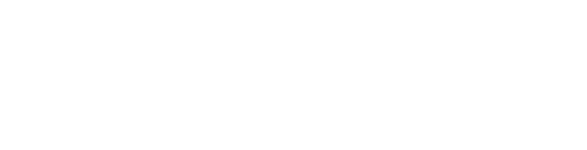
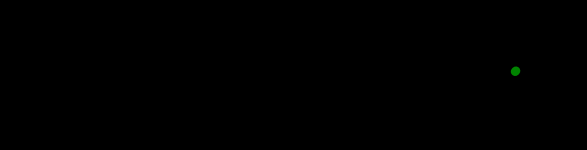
bottom track: none -> (515, 70) (515, 71)

